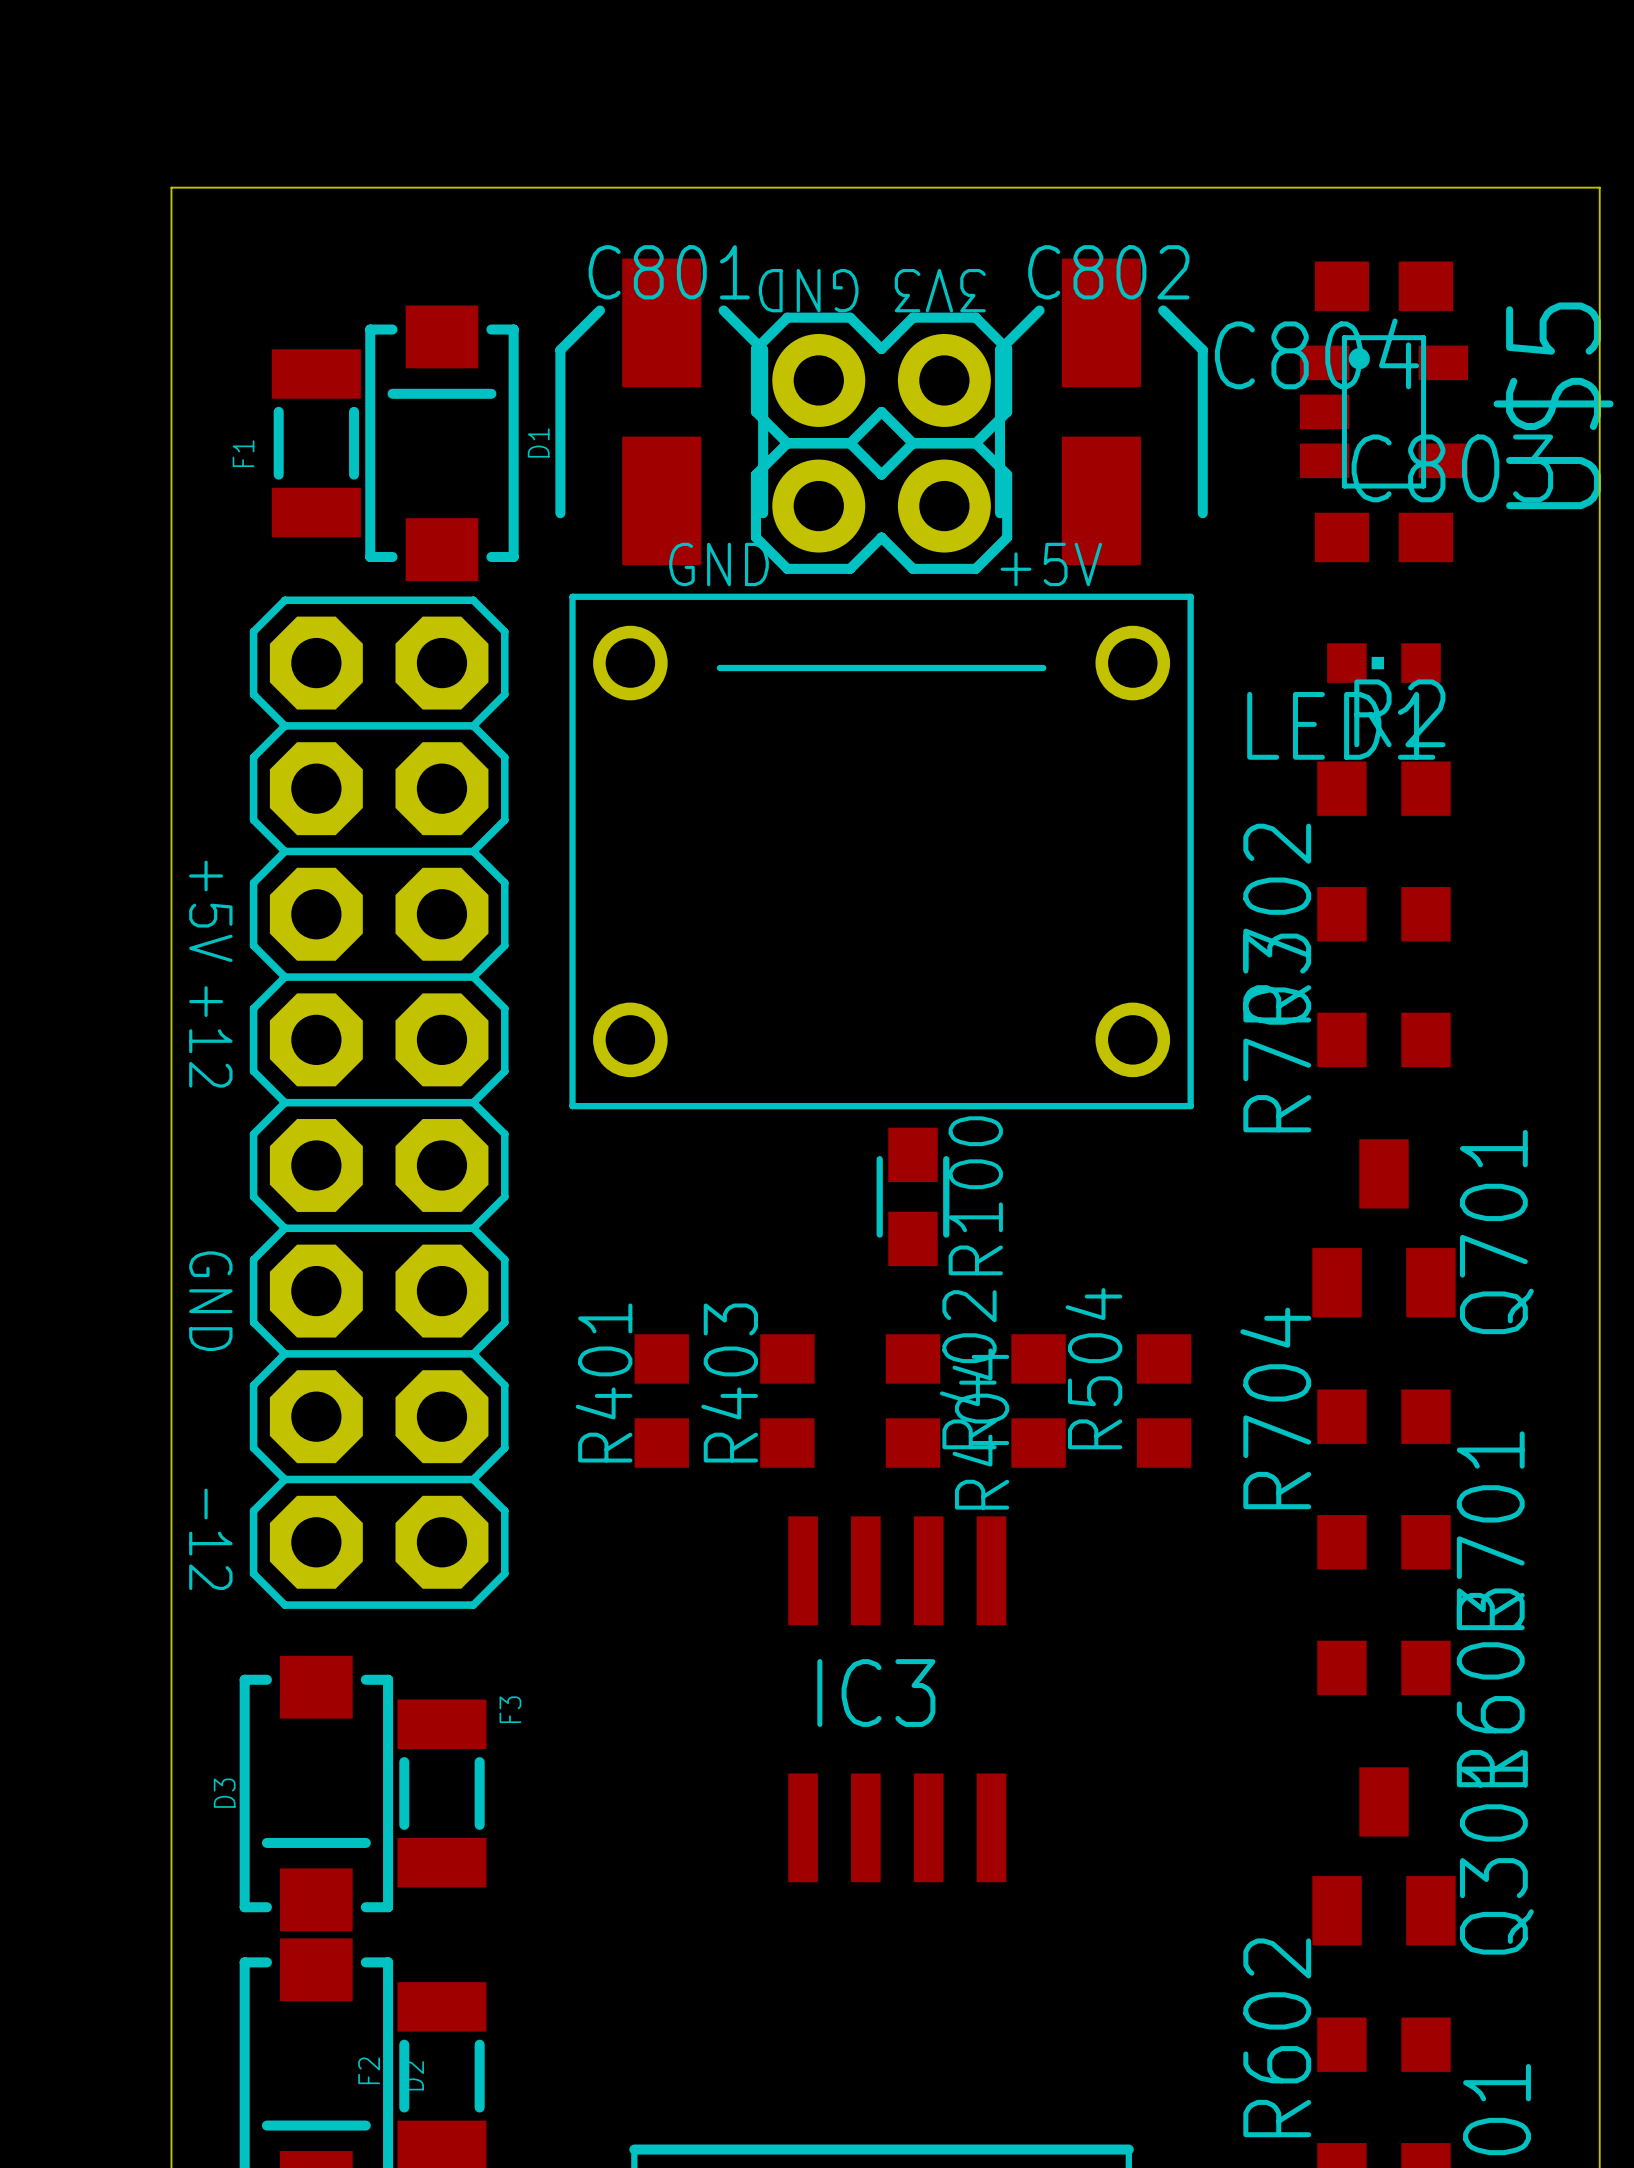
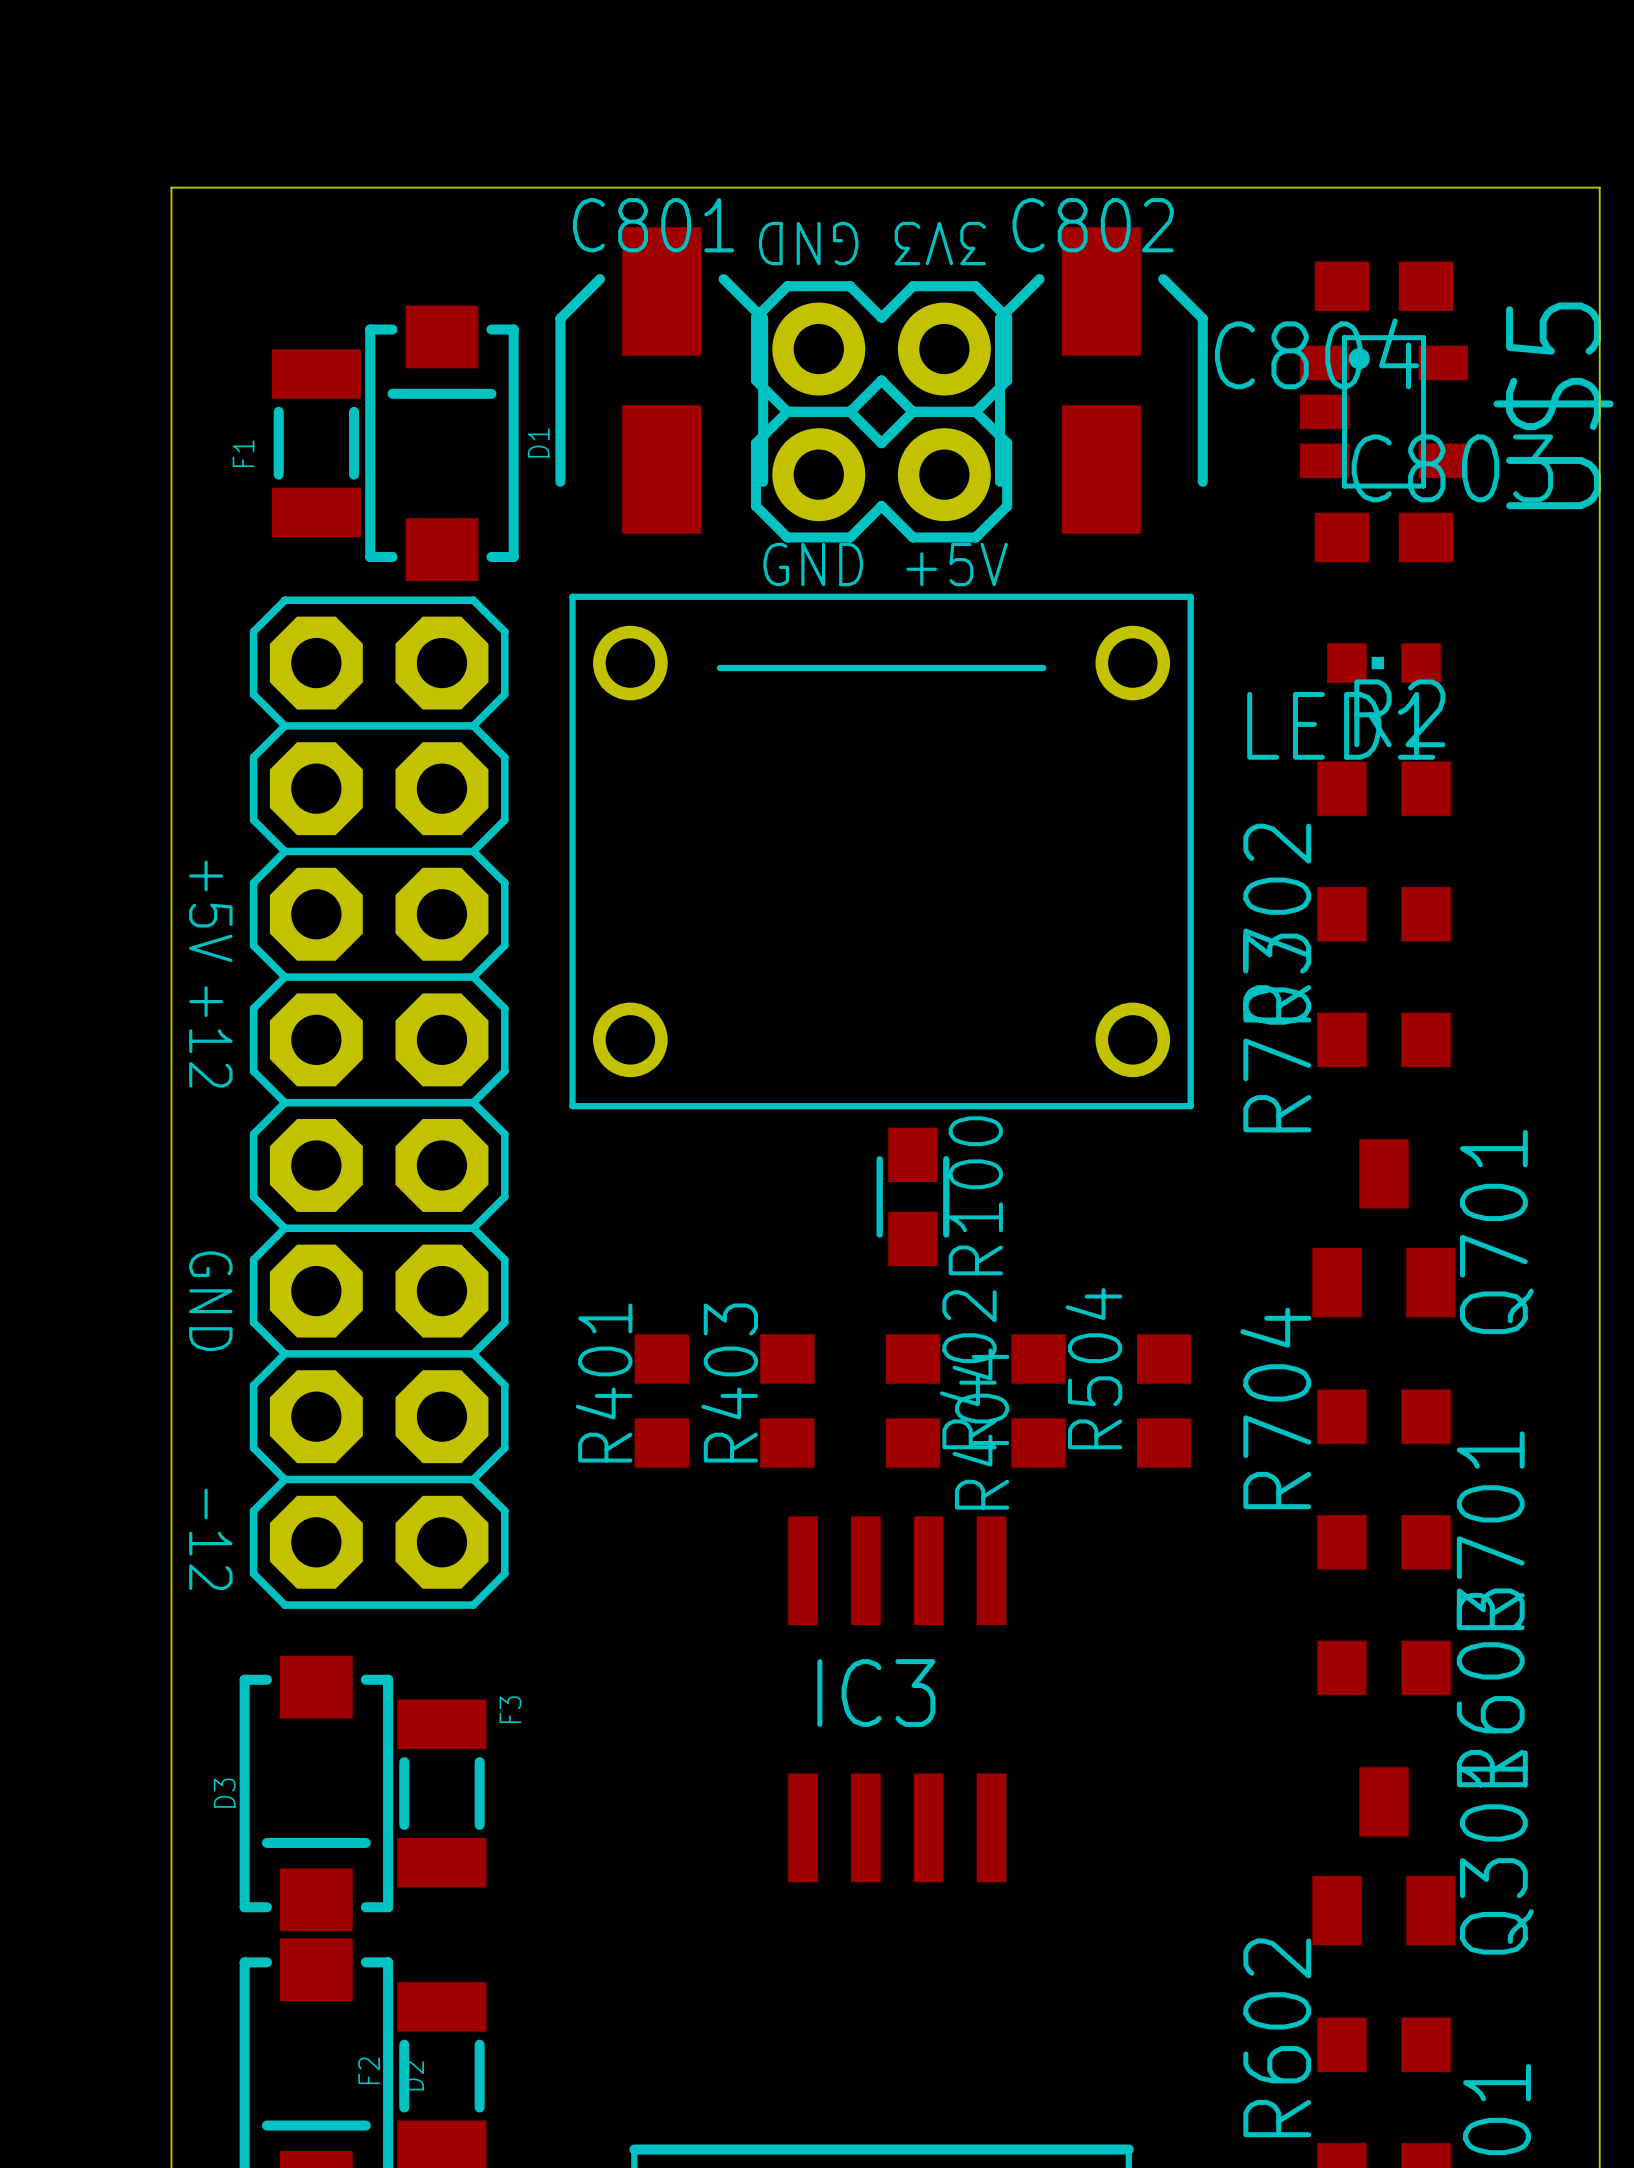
C801 name position: C801 (669, 272) -> C801 (653, 225)
C802 name position: C802 (1108, 272) -> C802 (1093, 225)
text position: GND (808, 290) -> GND (808, 243)
text position: 3V3 (940, 290) -> 3V3 (940, 243)
part position: (881, 380) -> (881, 349)
C801 position: (661, 411) -> (661, 380)
C802 position: (1101, 411) -> (1101, 380)
part position: (881, 506) -> (881, 474)
text position: GND (719, 564) -> GND (813, 564)
text position: +5V (1051, 564) -> +5V (957, 564)

